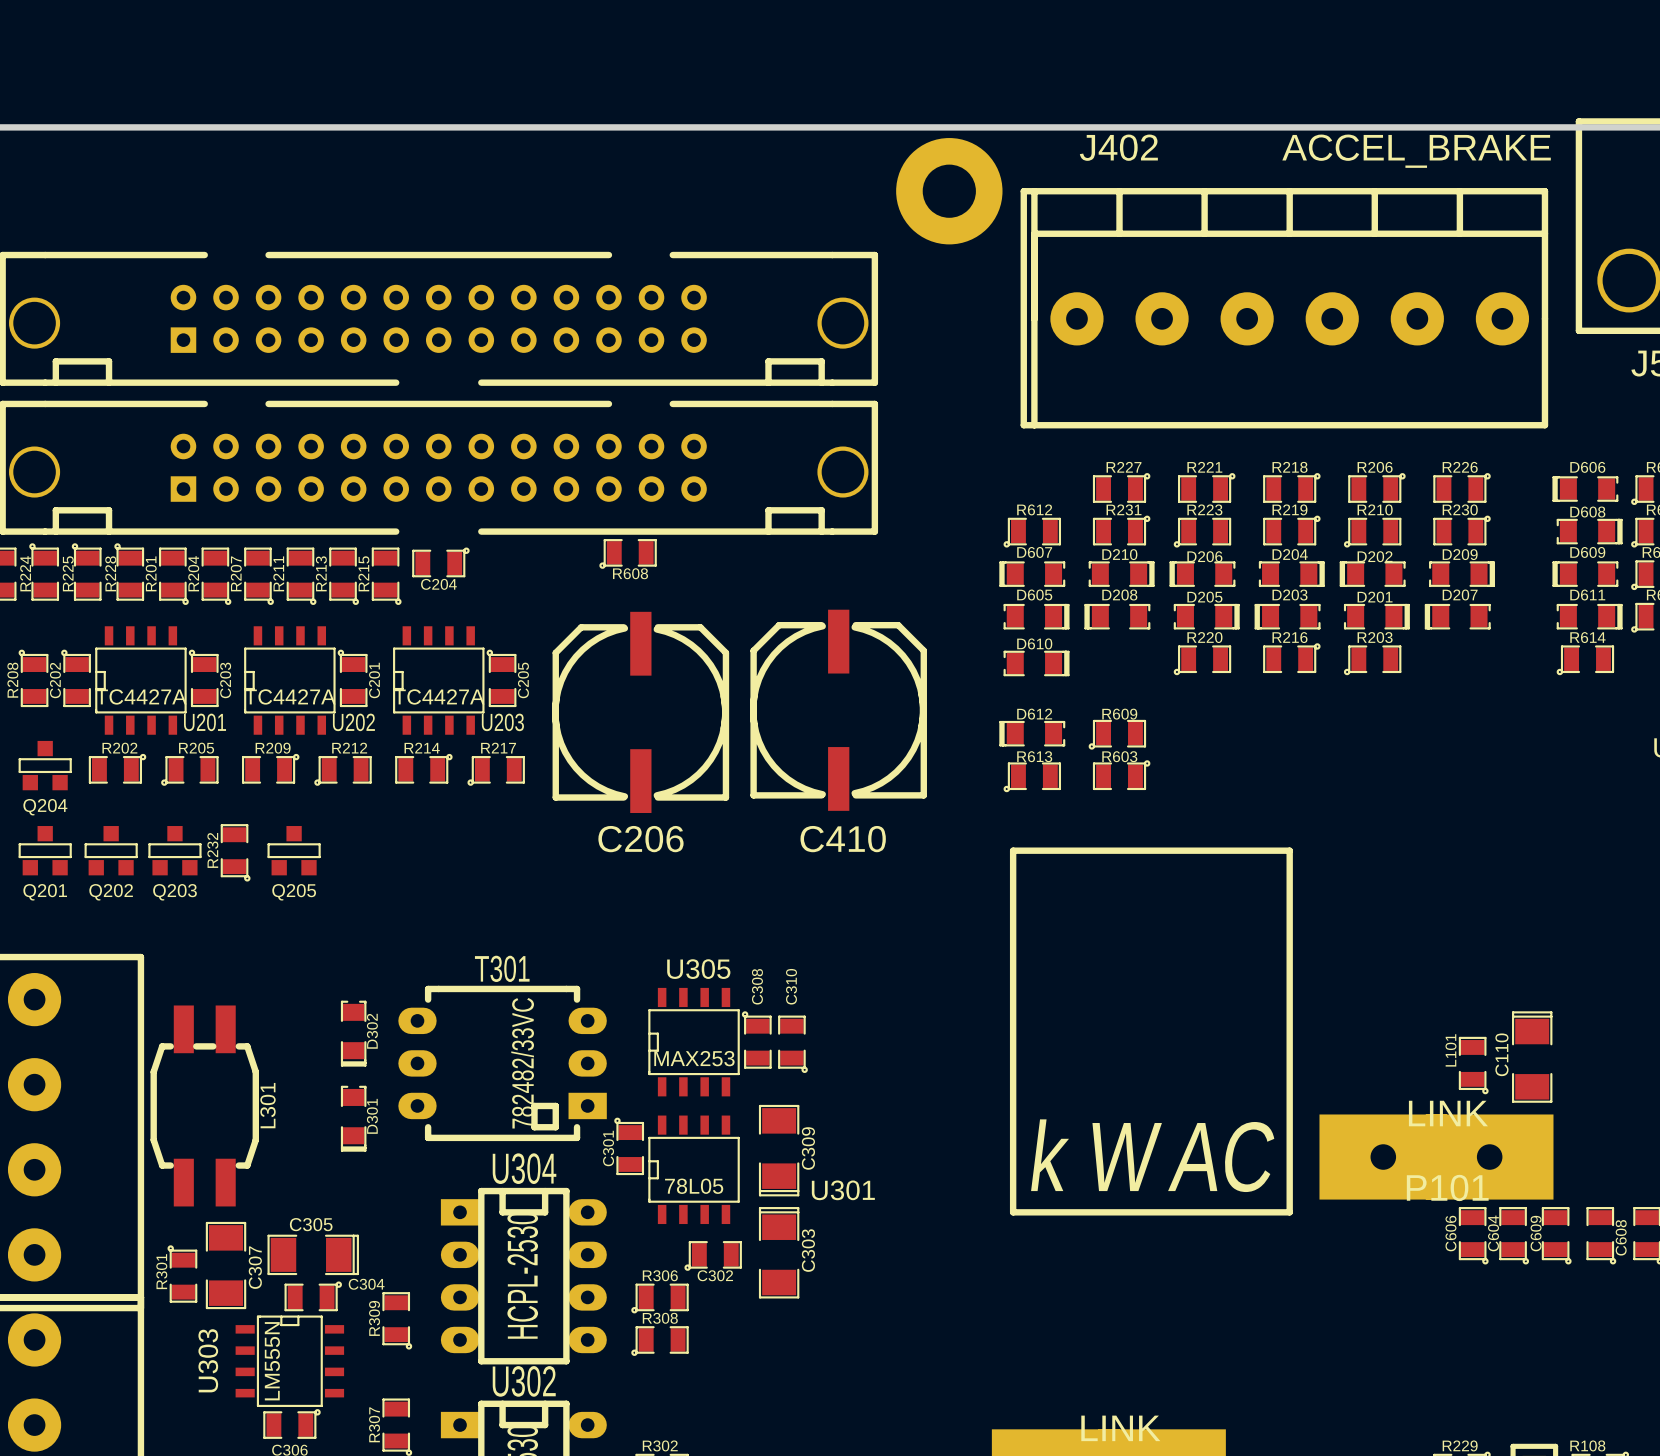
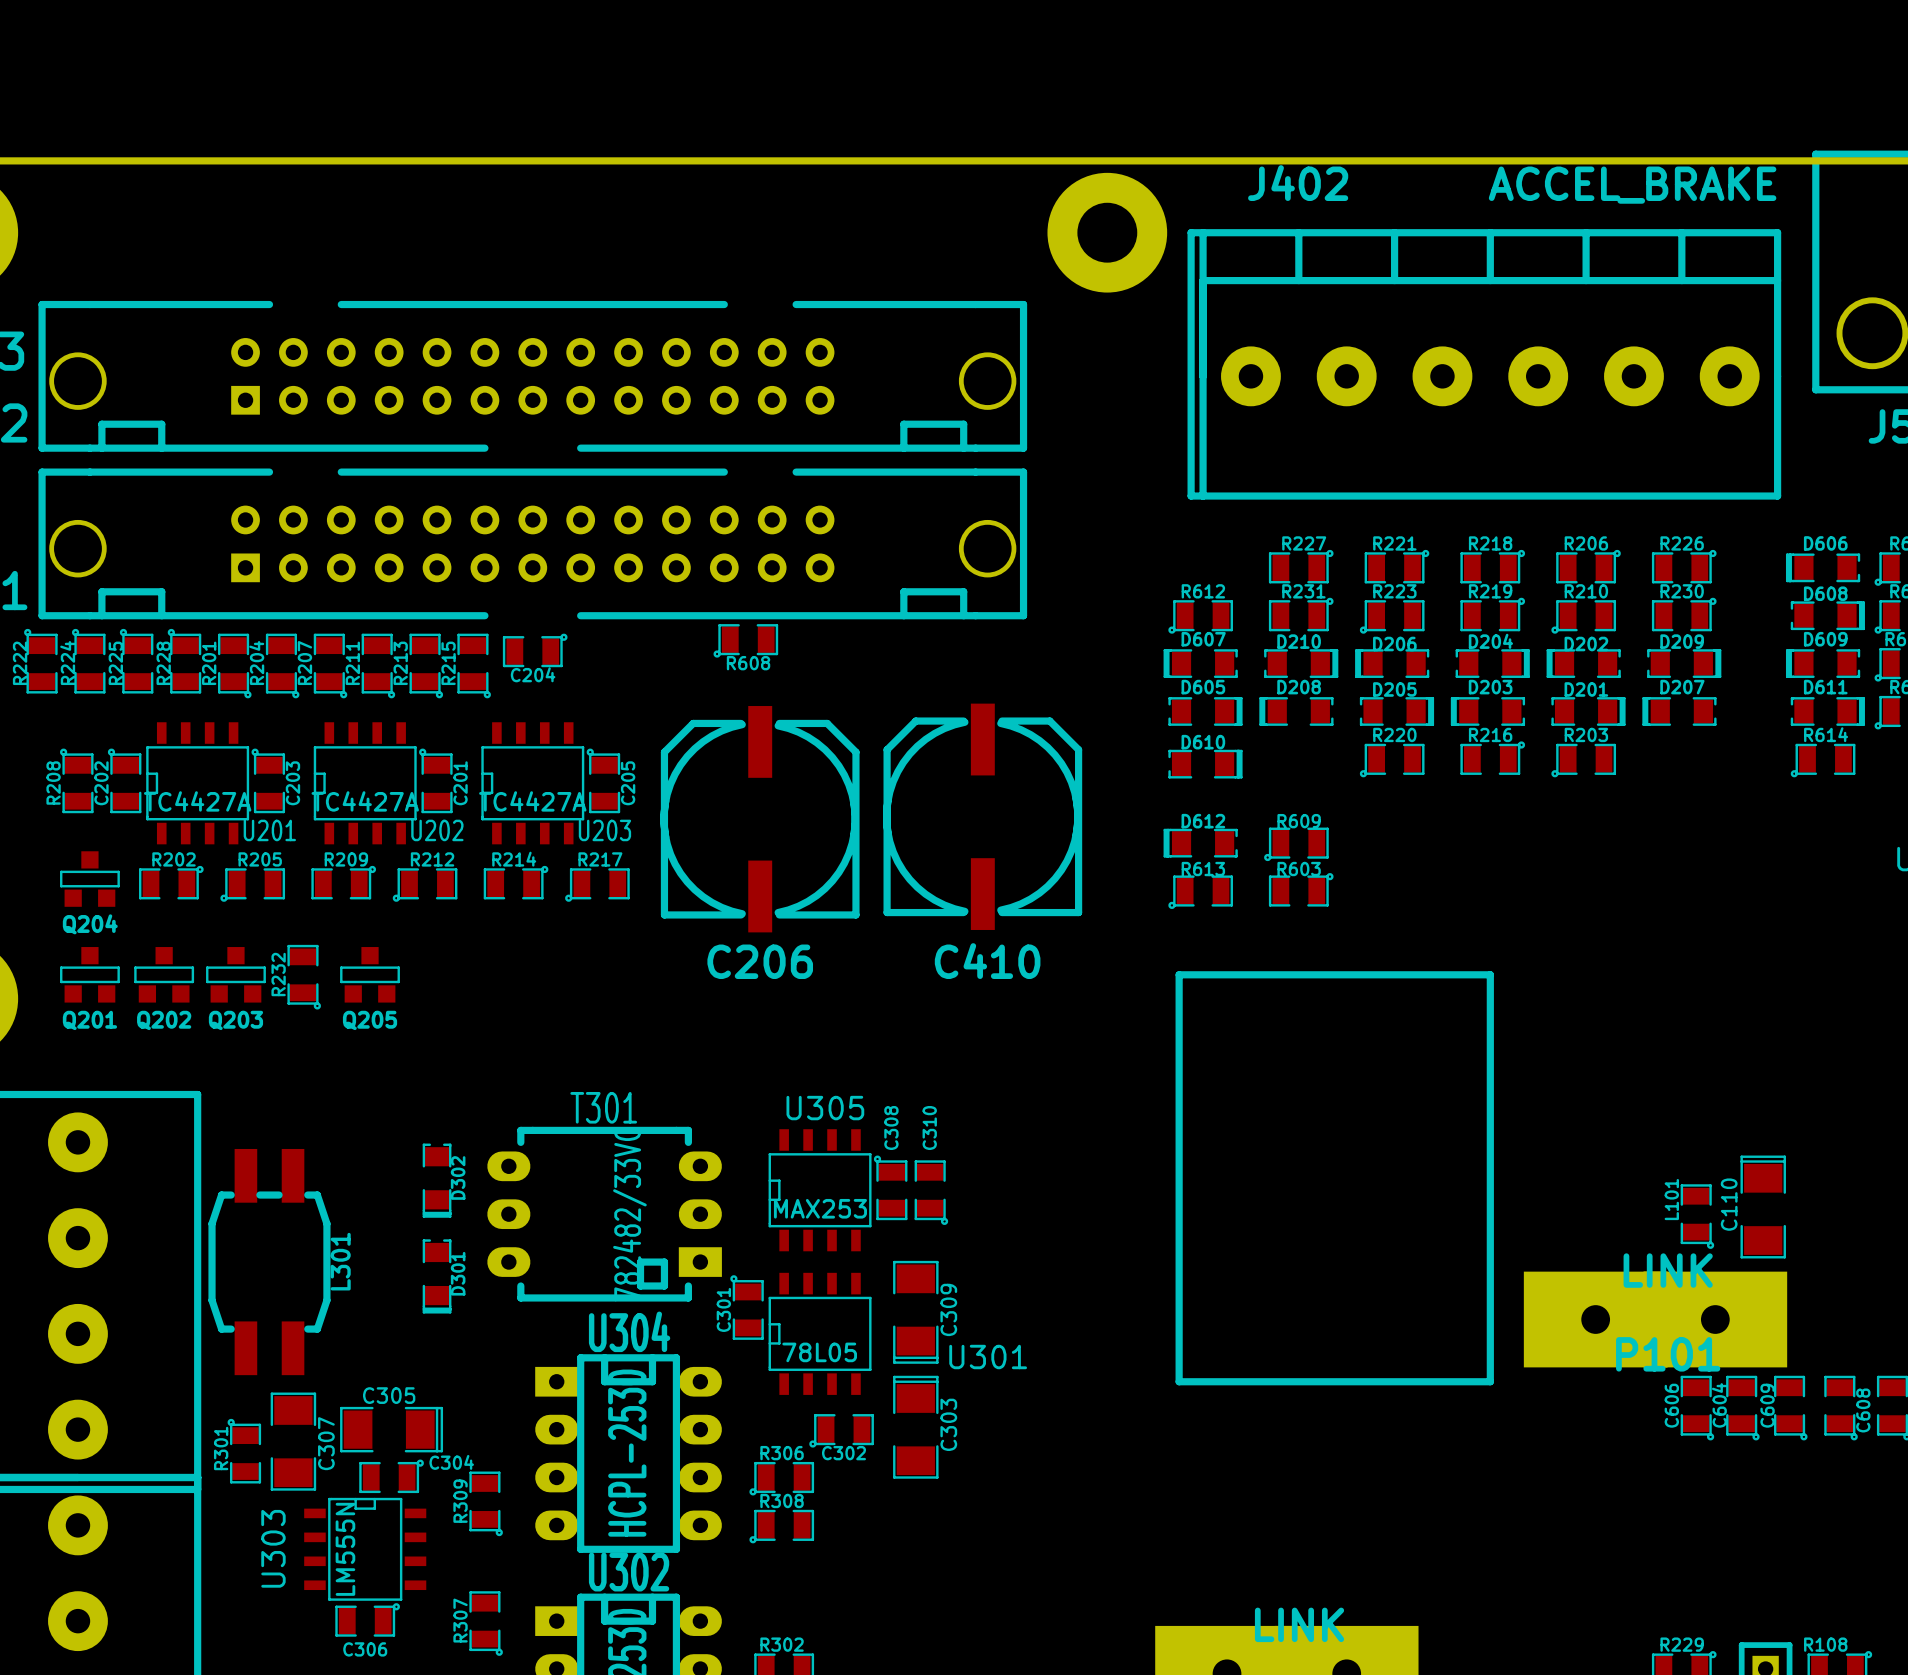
text: k (1050, 1155) -> none
text: W (1127, 1157) -> none
text: AC (1221, 1157) -> none

